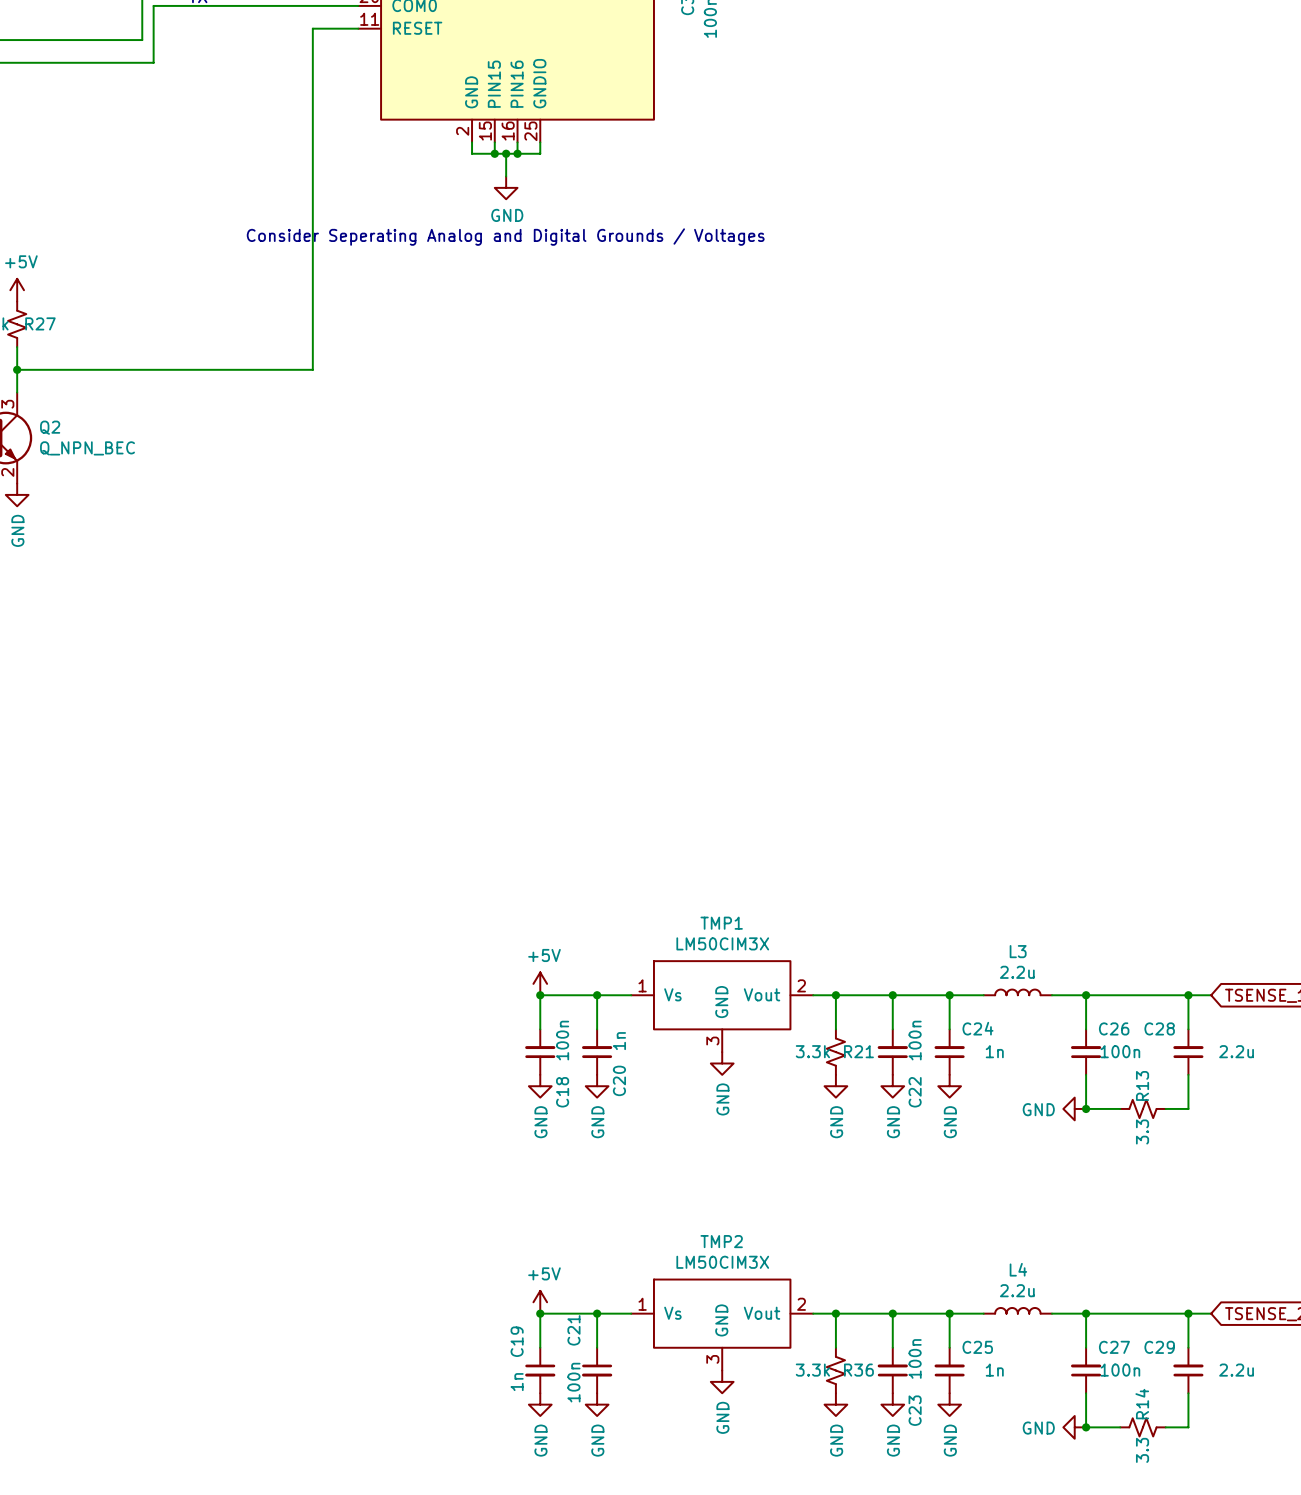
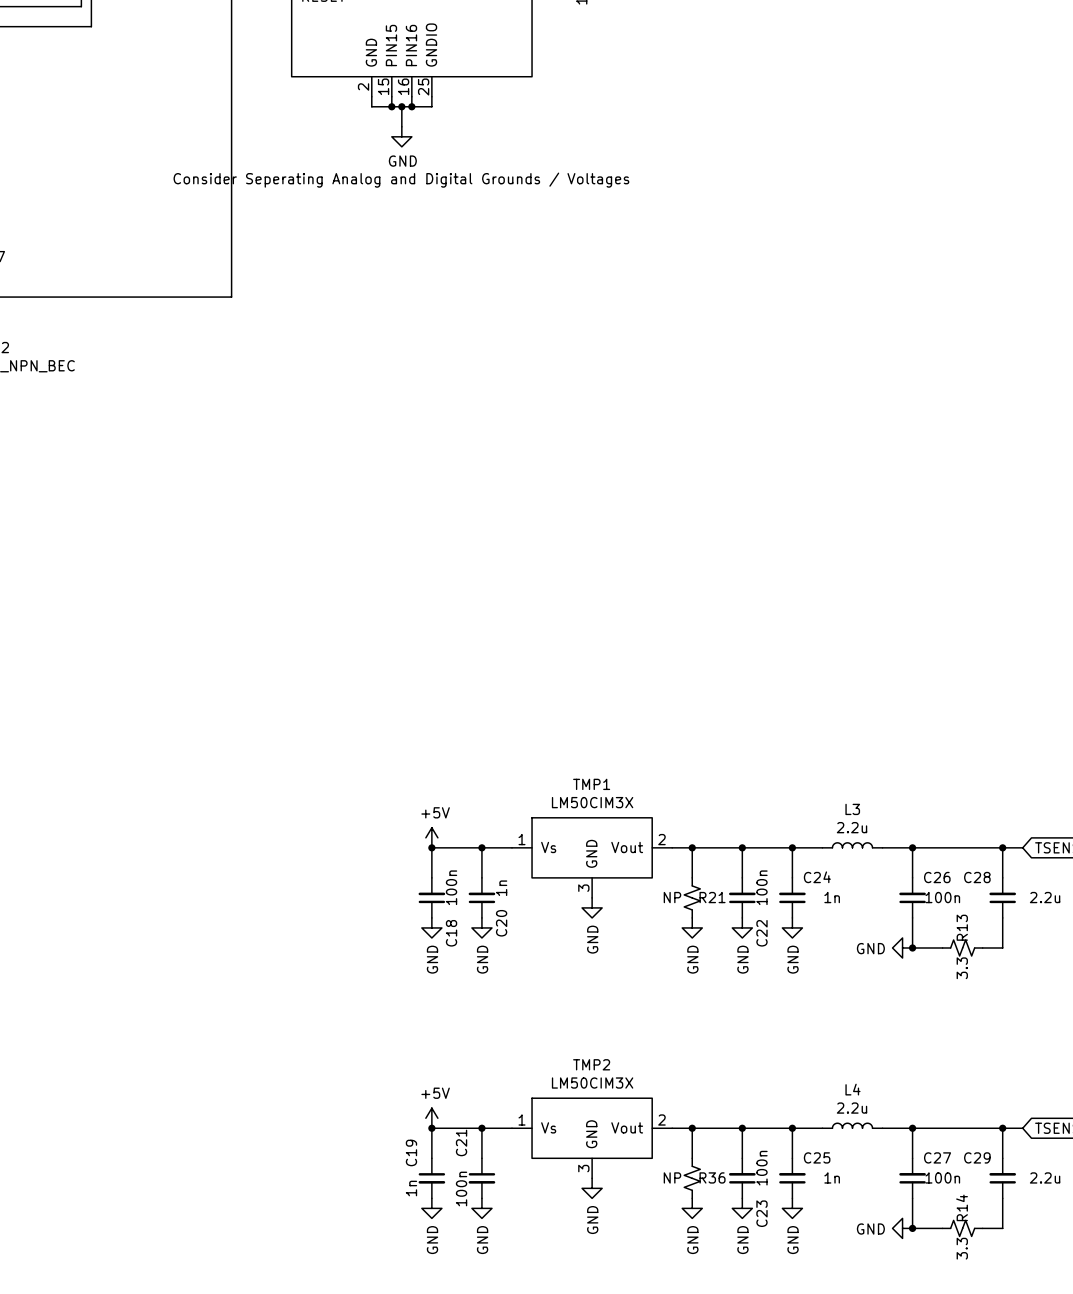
R21 value: 3.3k (812, 1051) -> NP (672, 897)
R36 value: 3.3k (812, 1370) -> NP (672, 1177)

